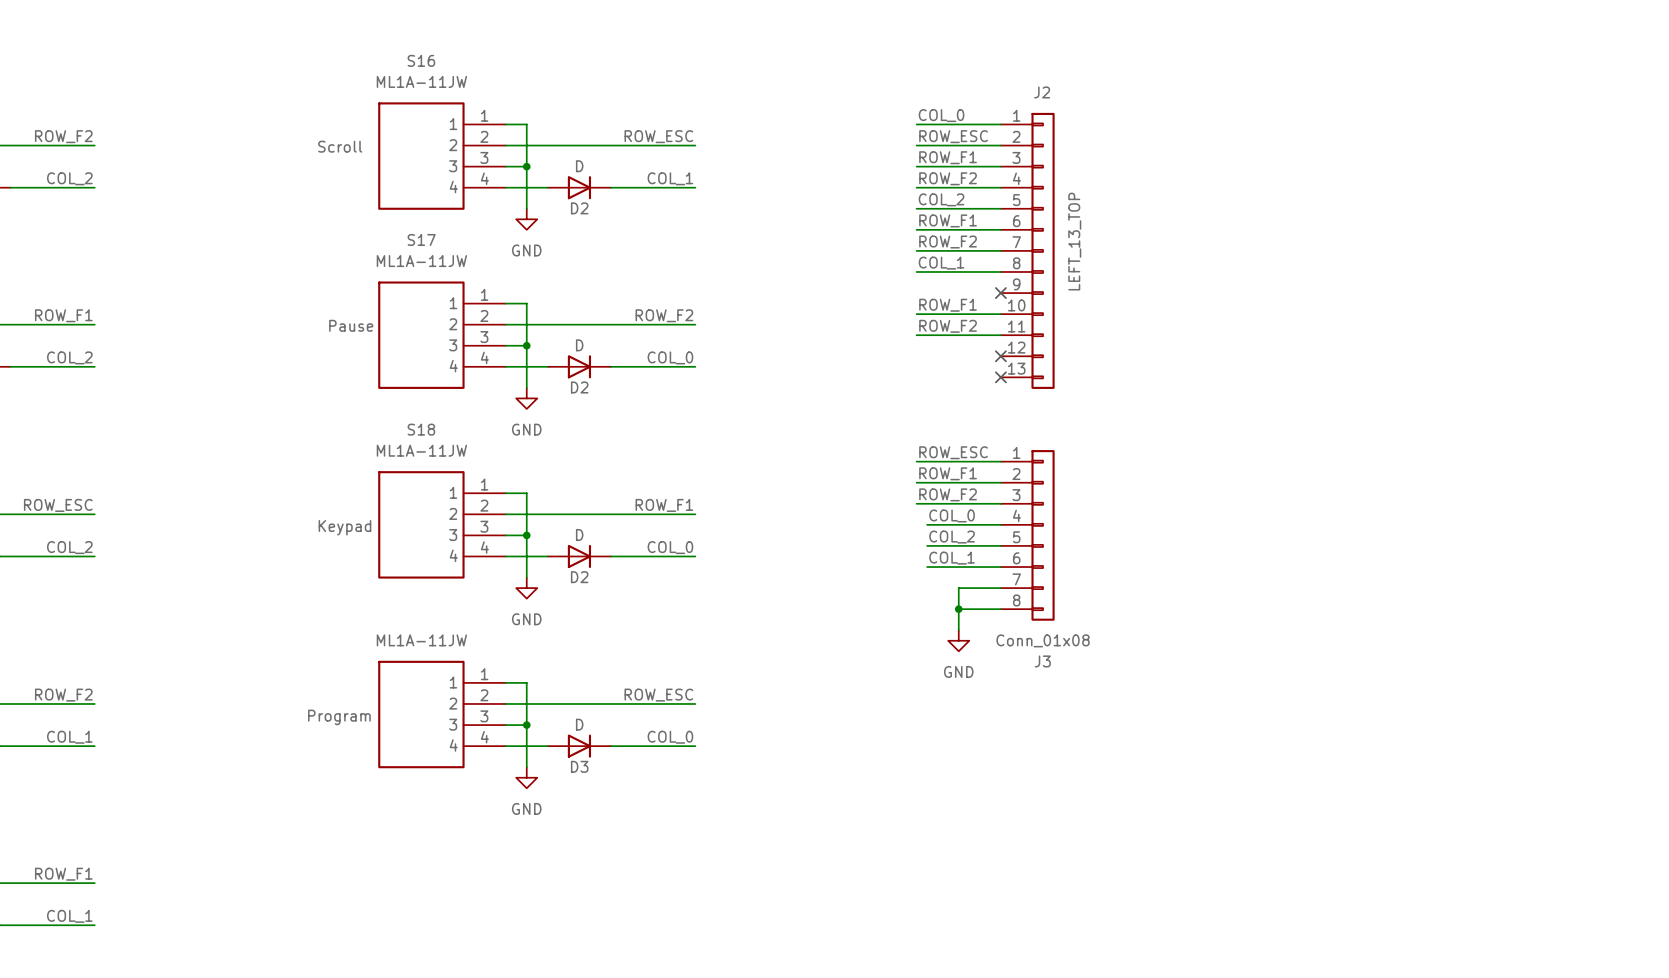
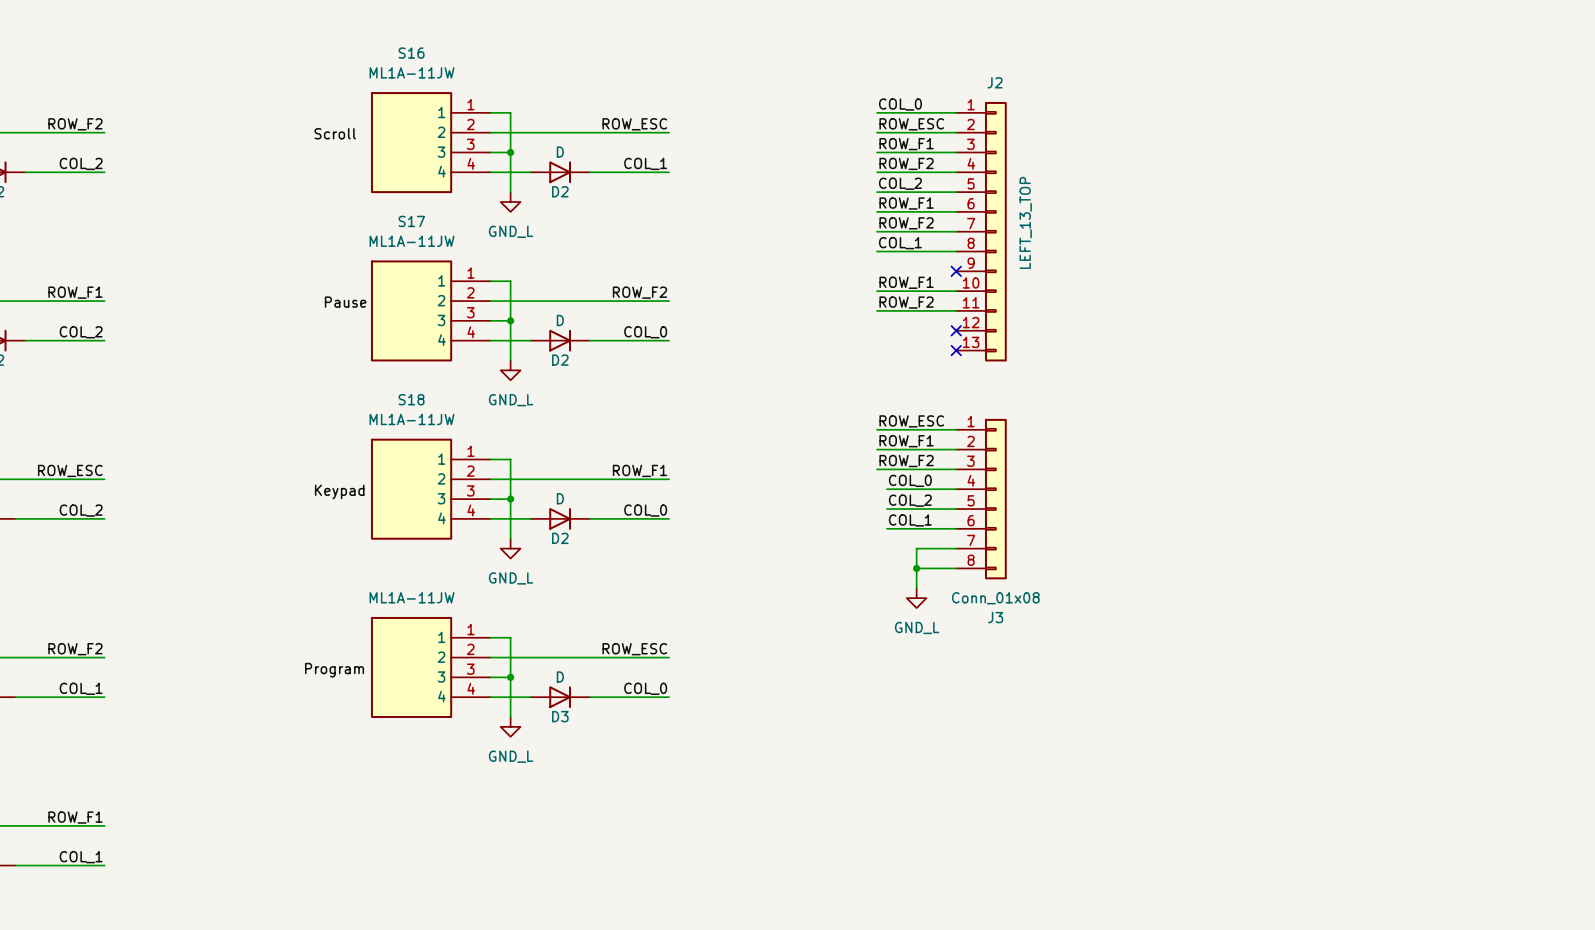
power symbol: GND (526, 219) -> GND_L (510, 202)
power symbol: GND (526, 398) -> GND_L (510, 370)
power symbol: GND (526, 588) -> GND_L (510, 548)
power symbol: GND (958, 640) -> GND_L (916, 598)
power symbol: GND (526, 777) -> GND_L (510, 726)

